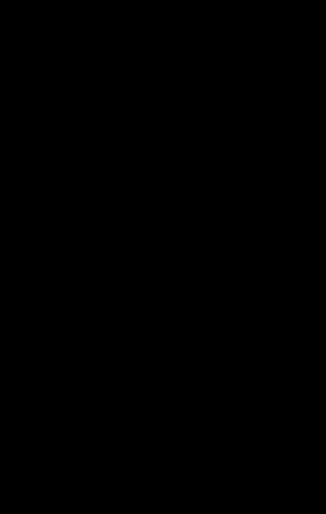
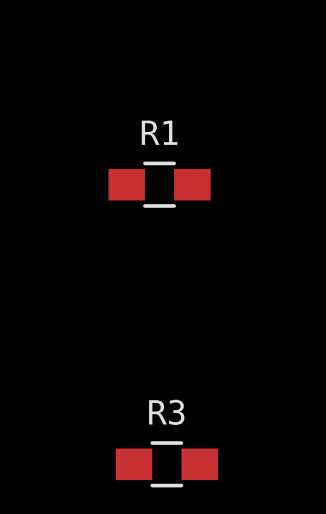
R1: none -> (159, 184)
R3: none -> (166, 464)

